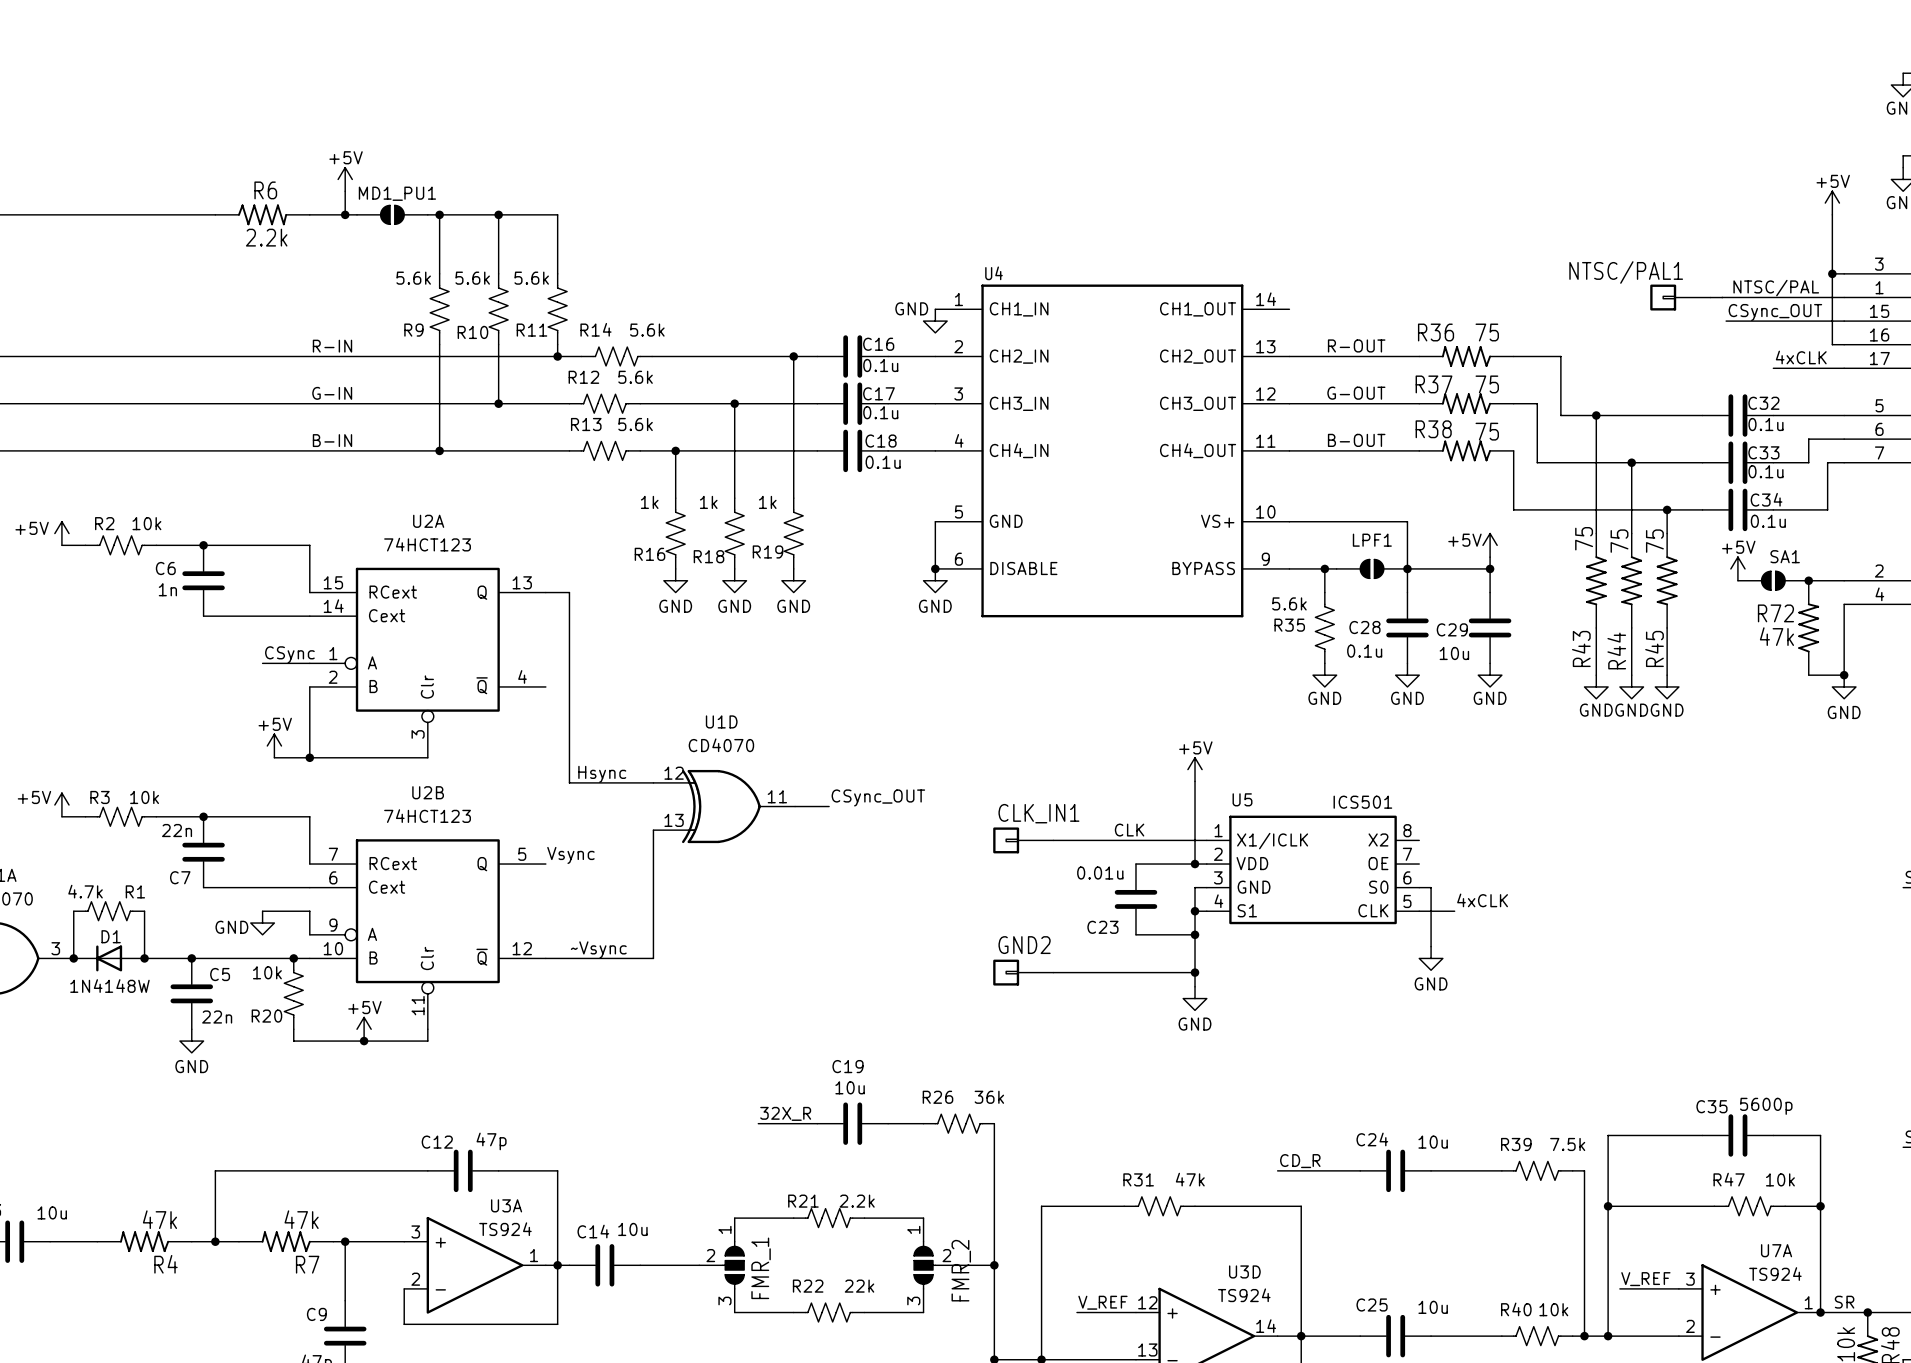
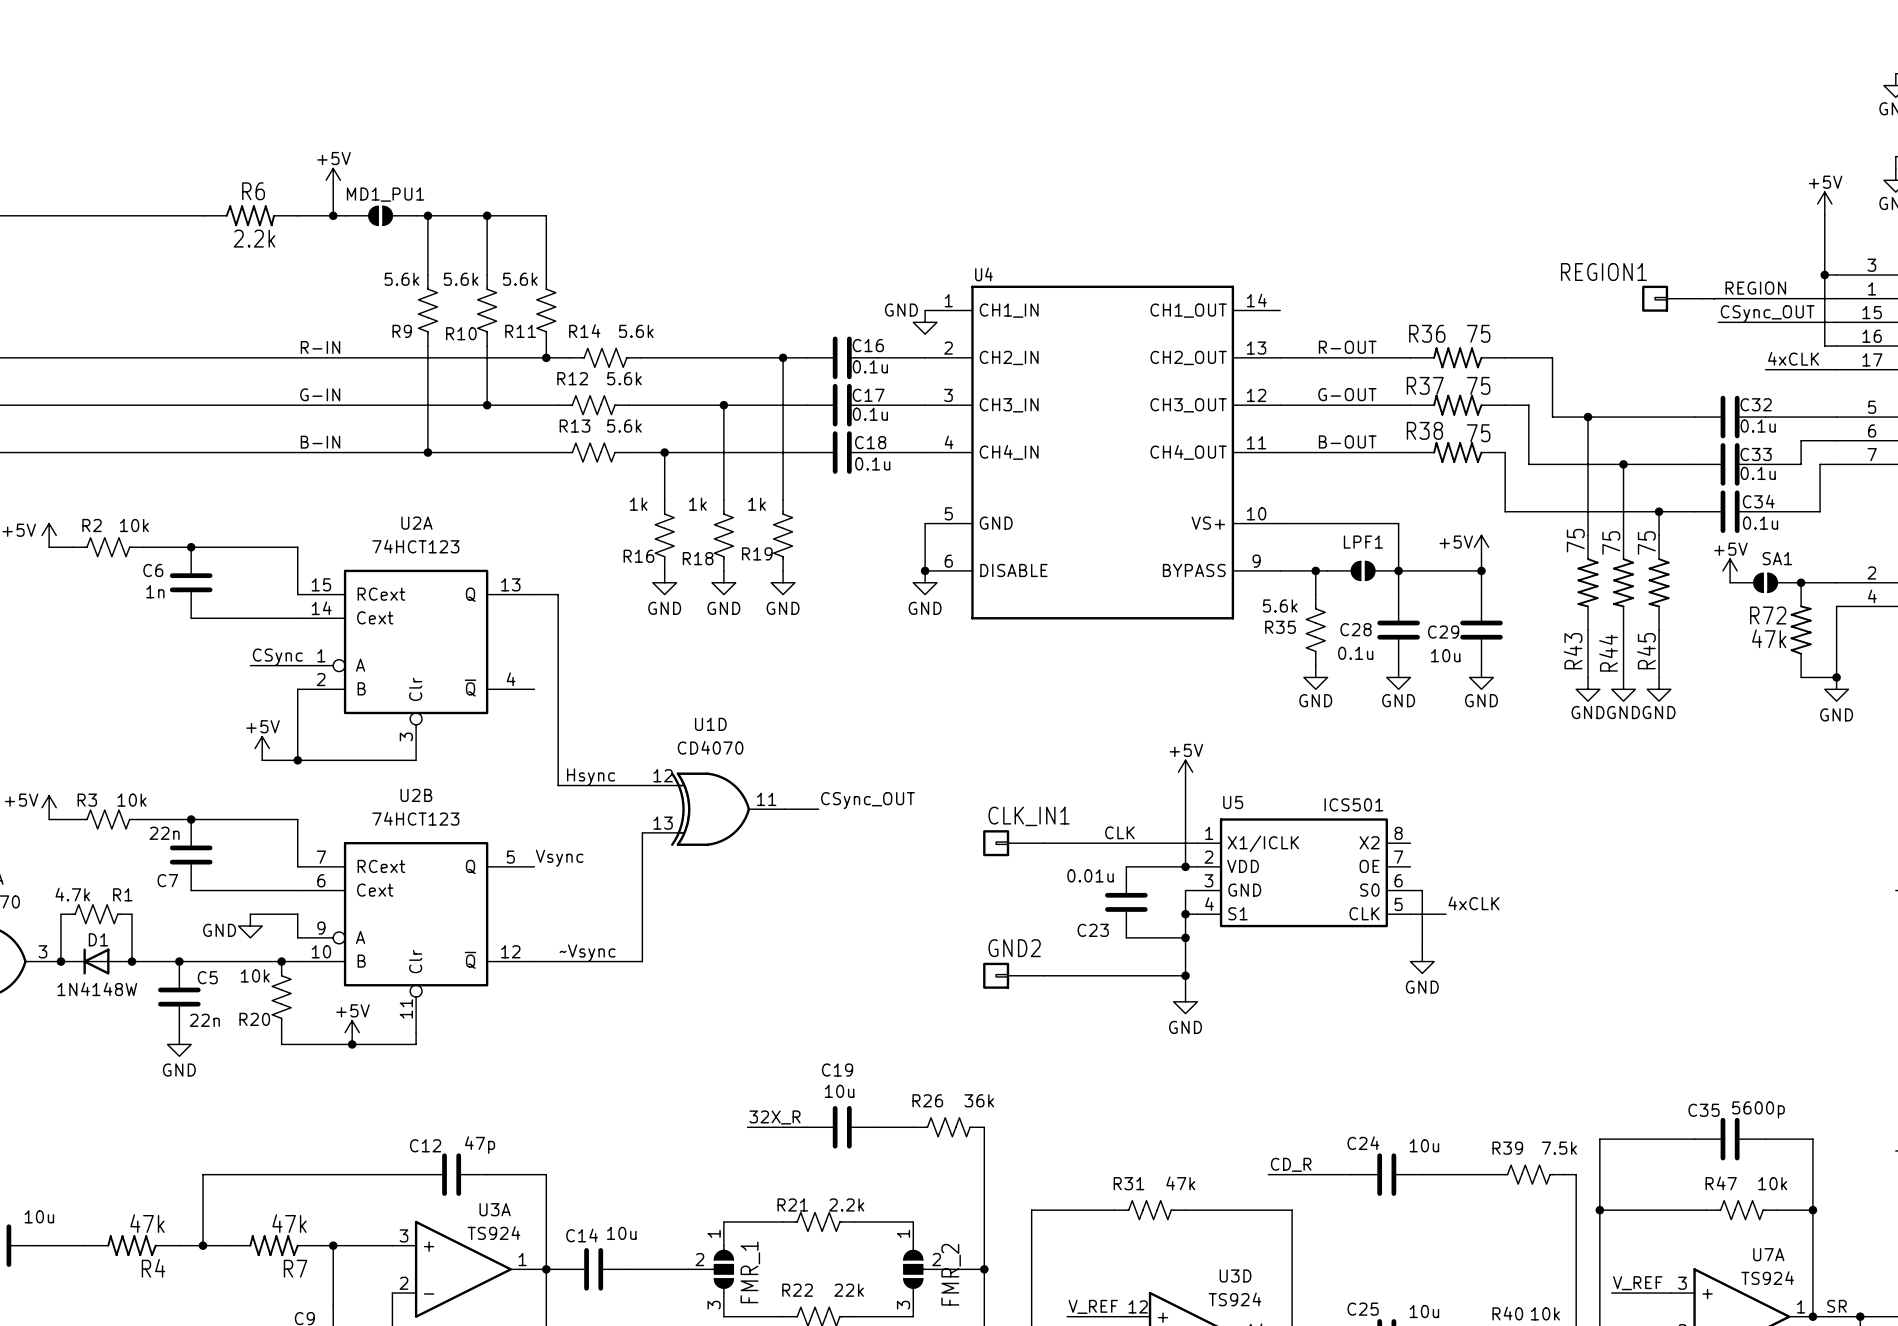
NTSC/PAL1 name: NTSC/PAL1 (1626, 272) -> REGION1 (1603, 272)
label: NTSC/PAL (1776, 288) -> REGION (1755, 288)

